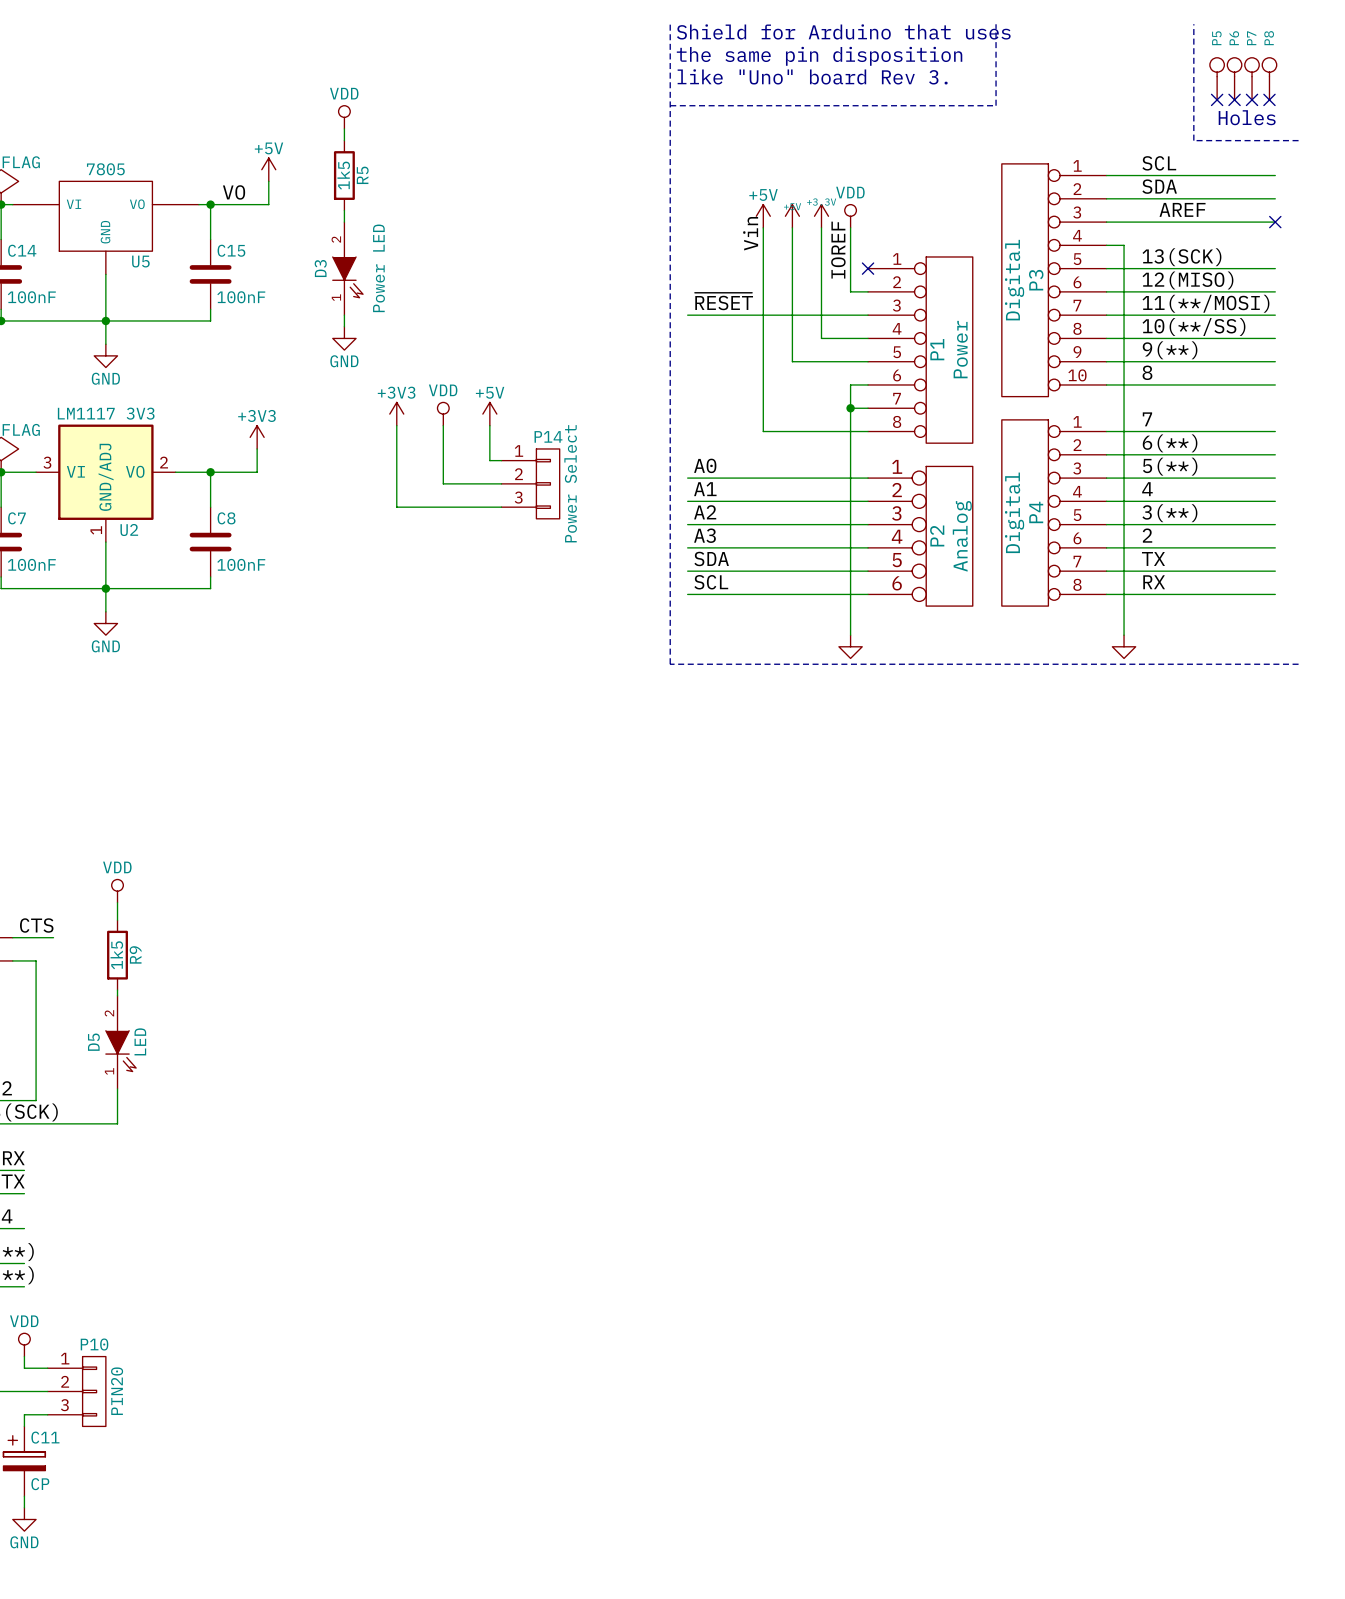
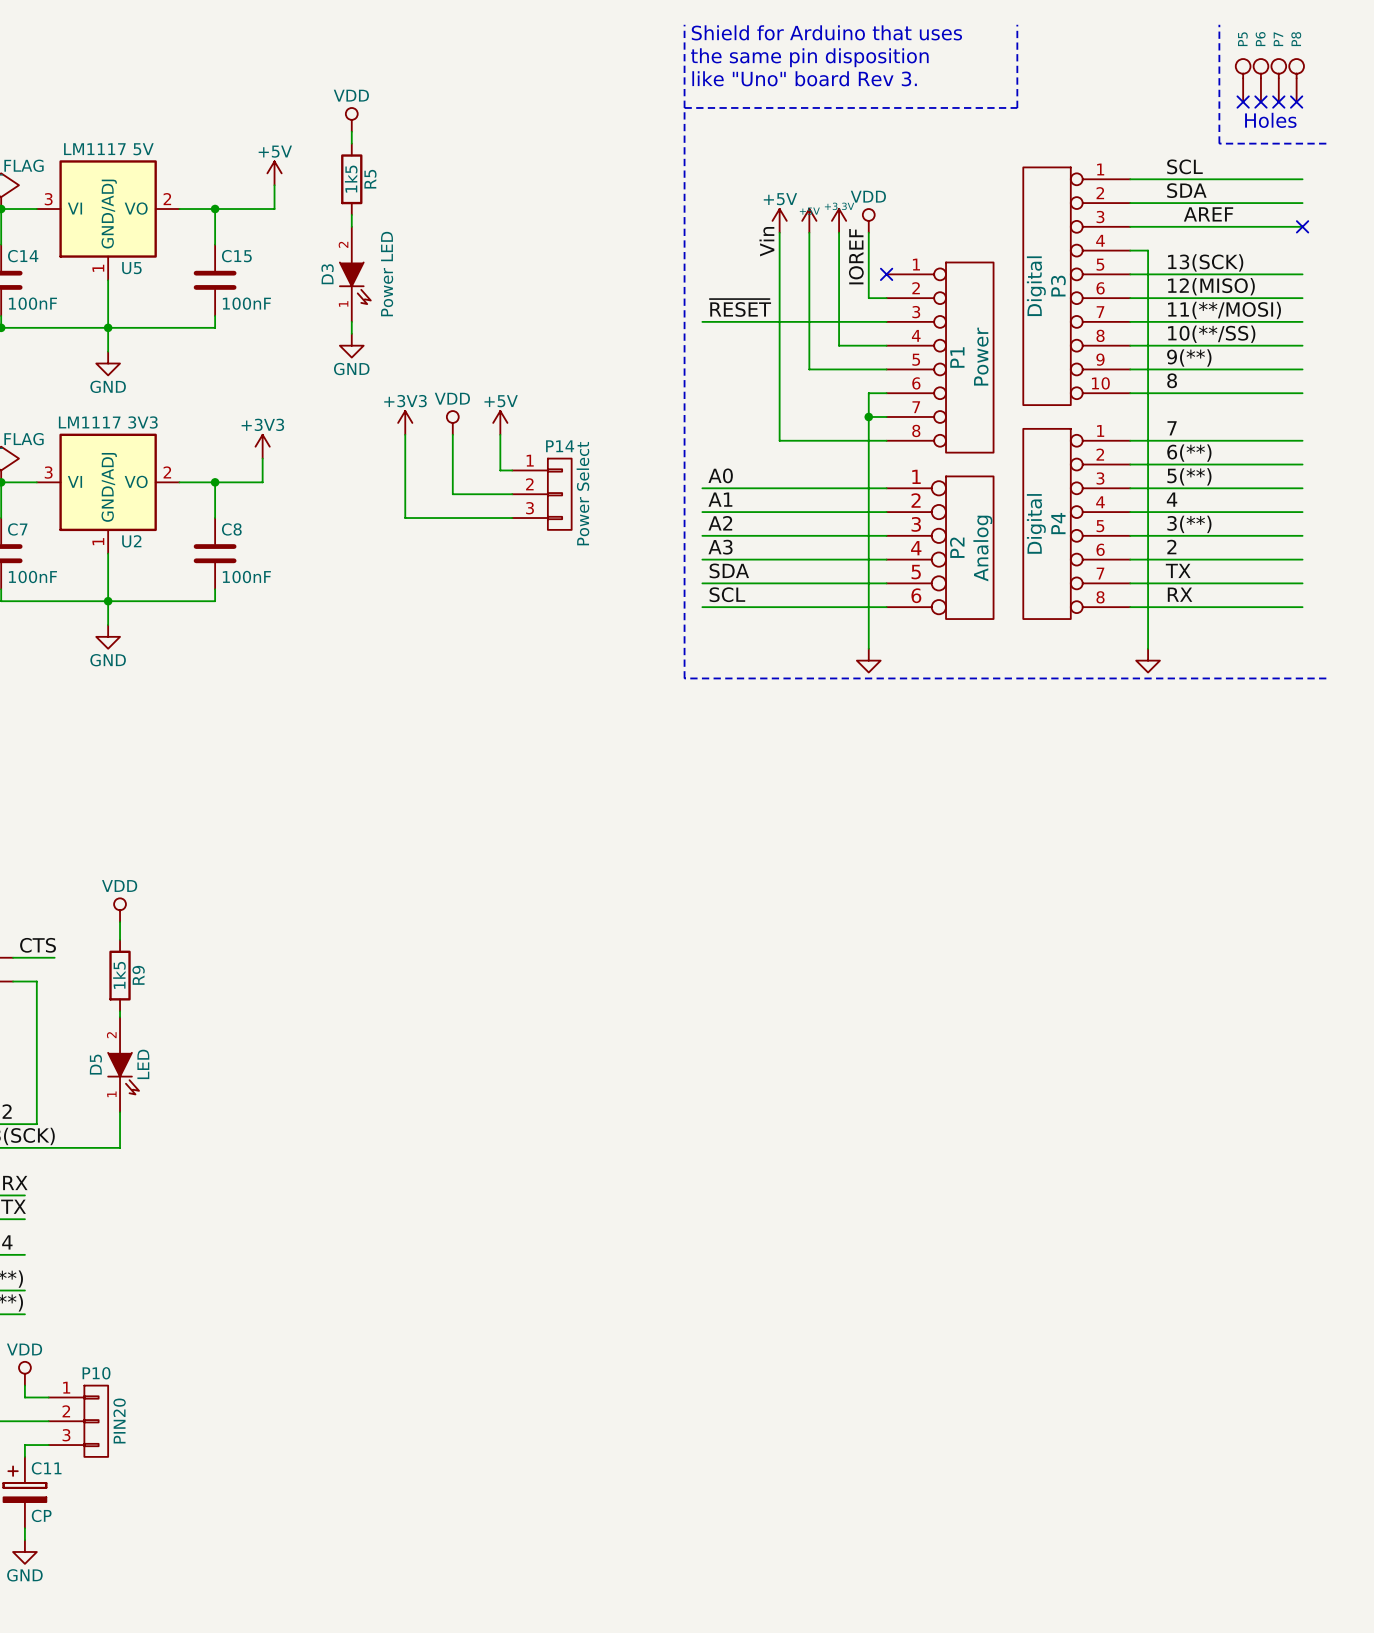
U5 value: 7805 (105, 169) -> LM1117 5V (108, 149)
U5 symbol: [12, 181, 199, 275] -> [36, 160, 180, 281]
label: VO (234, 192) -> none

